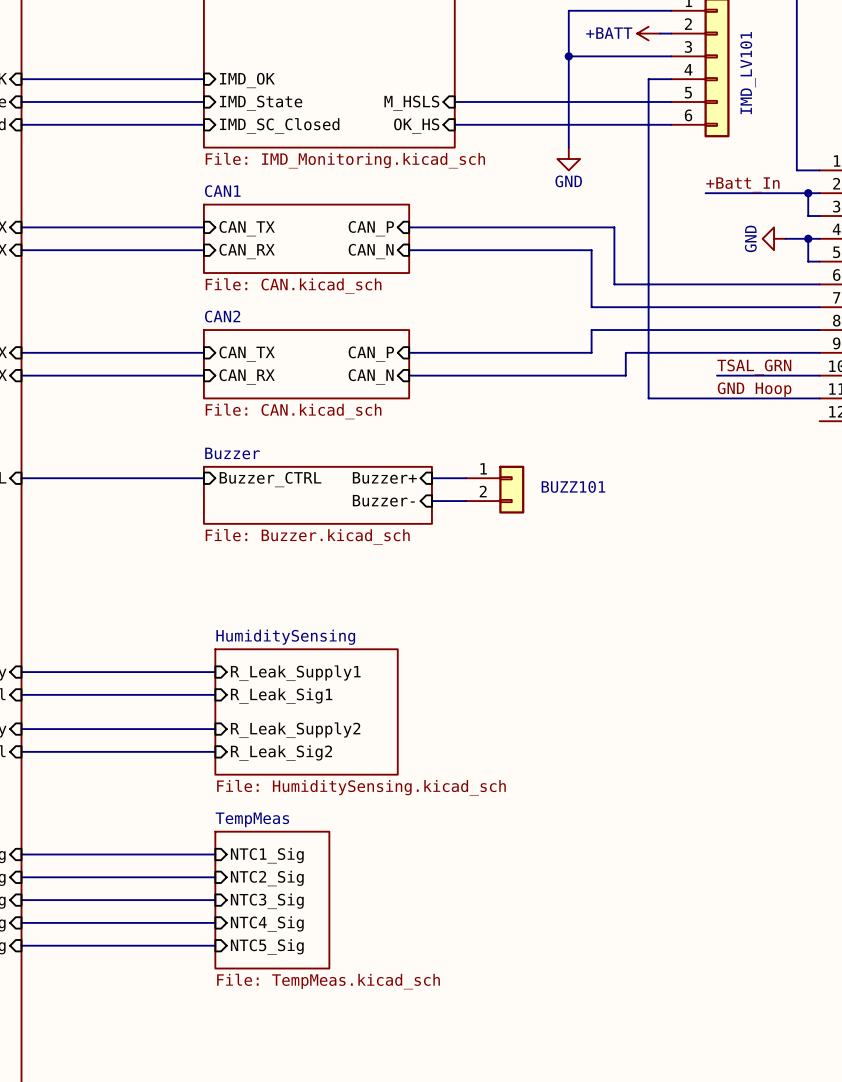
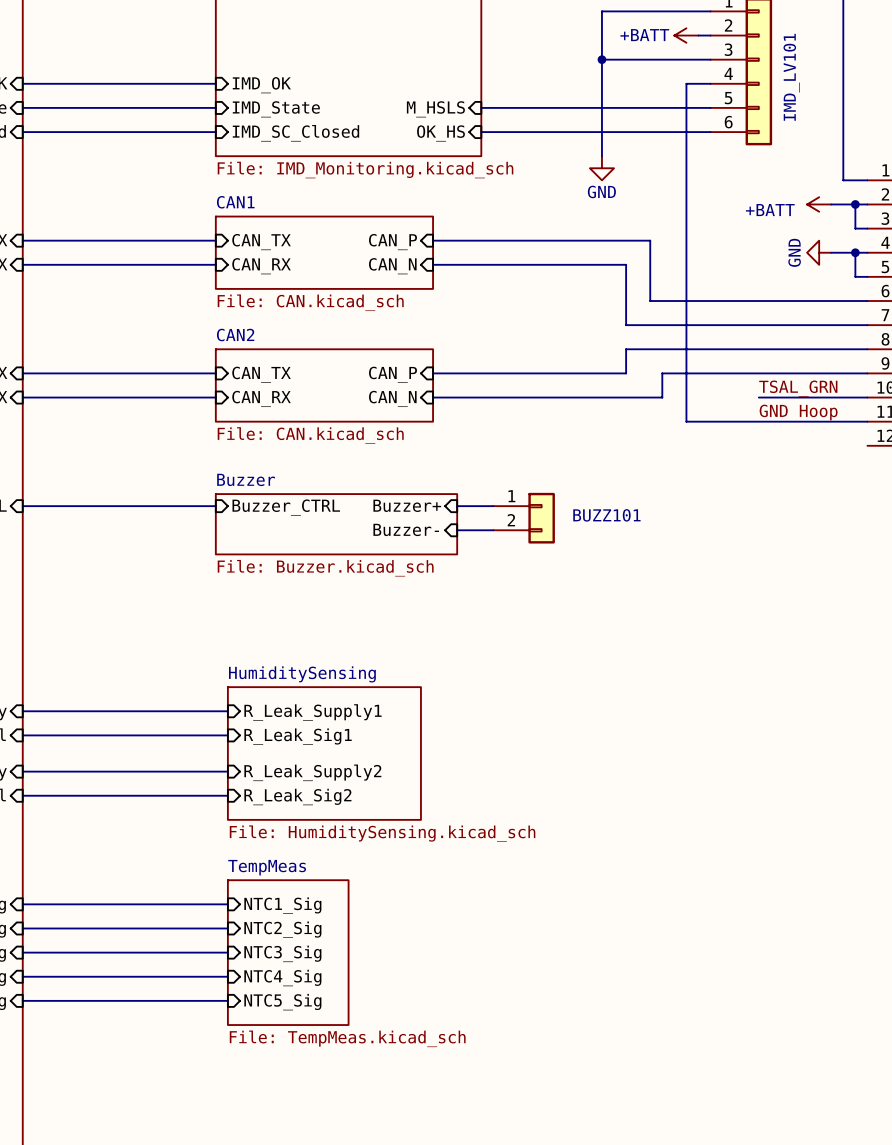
label: +Batt_In (742, 184) -> none
wire: (705, 193) (785, 193) -> none
power symbol: none -> +BATT (819, 204)

